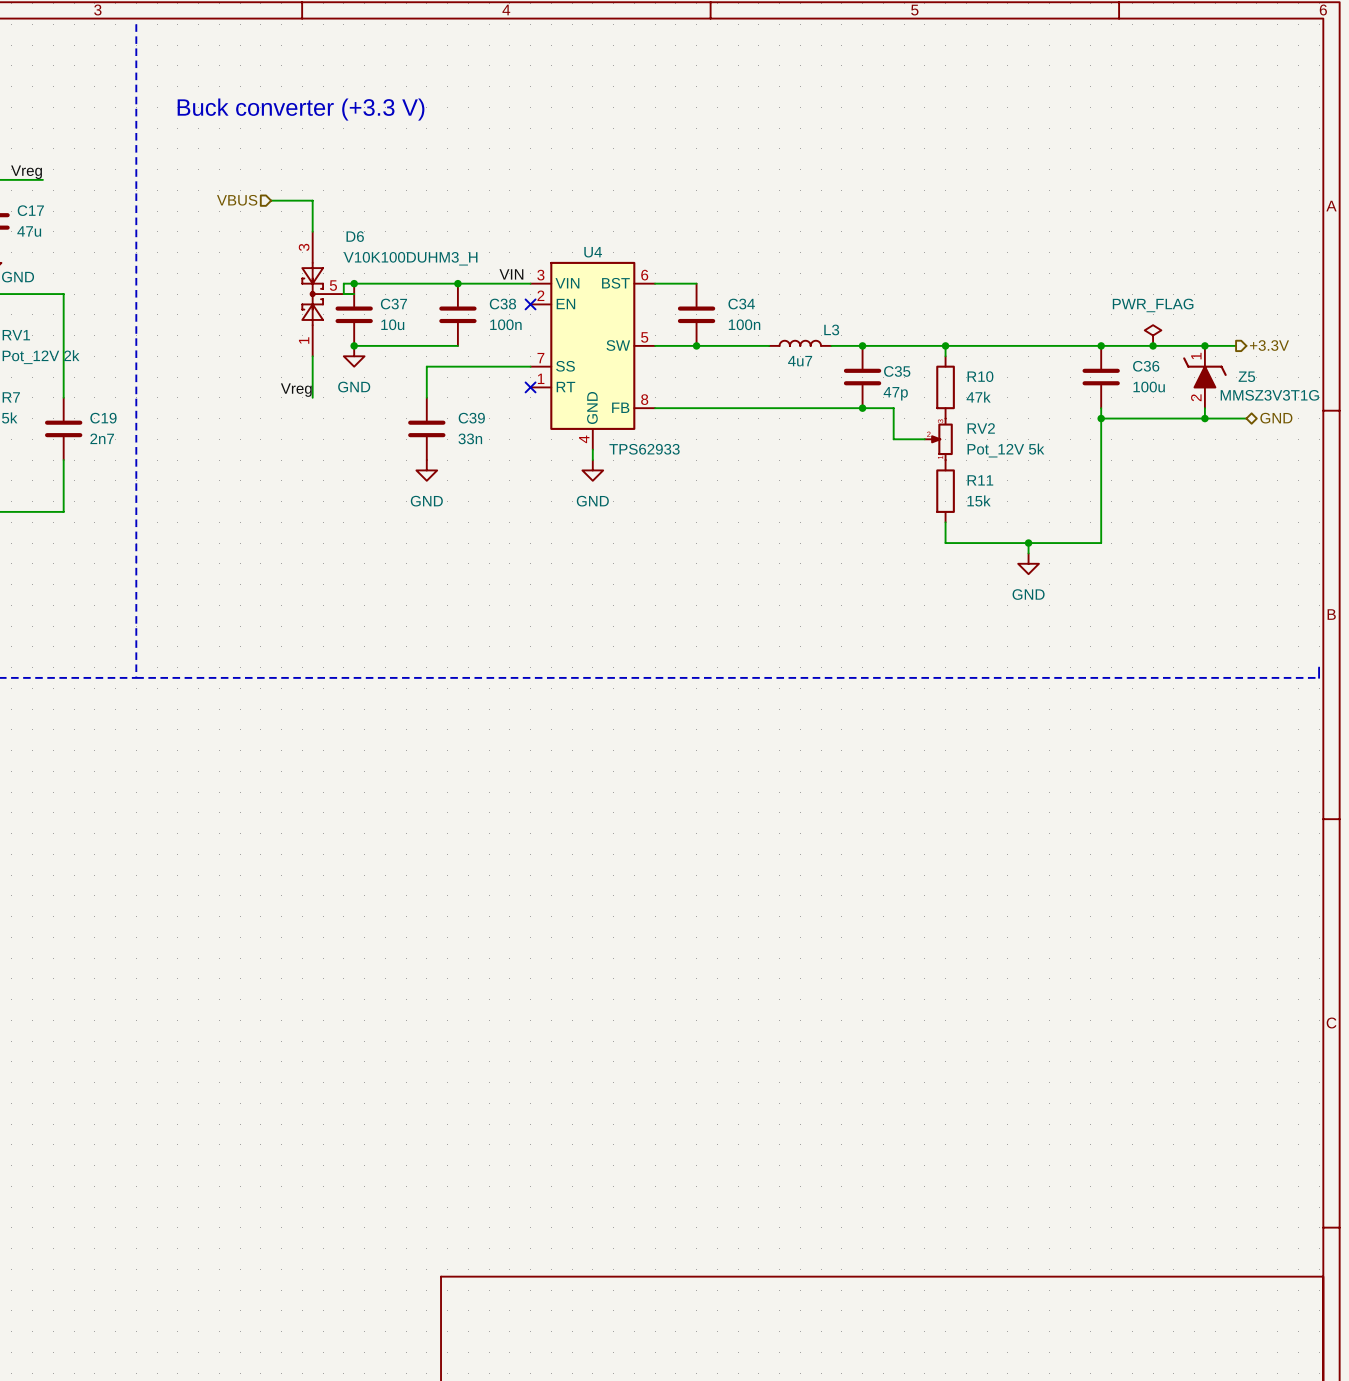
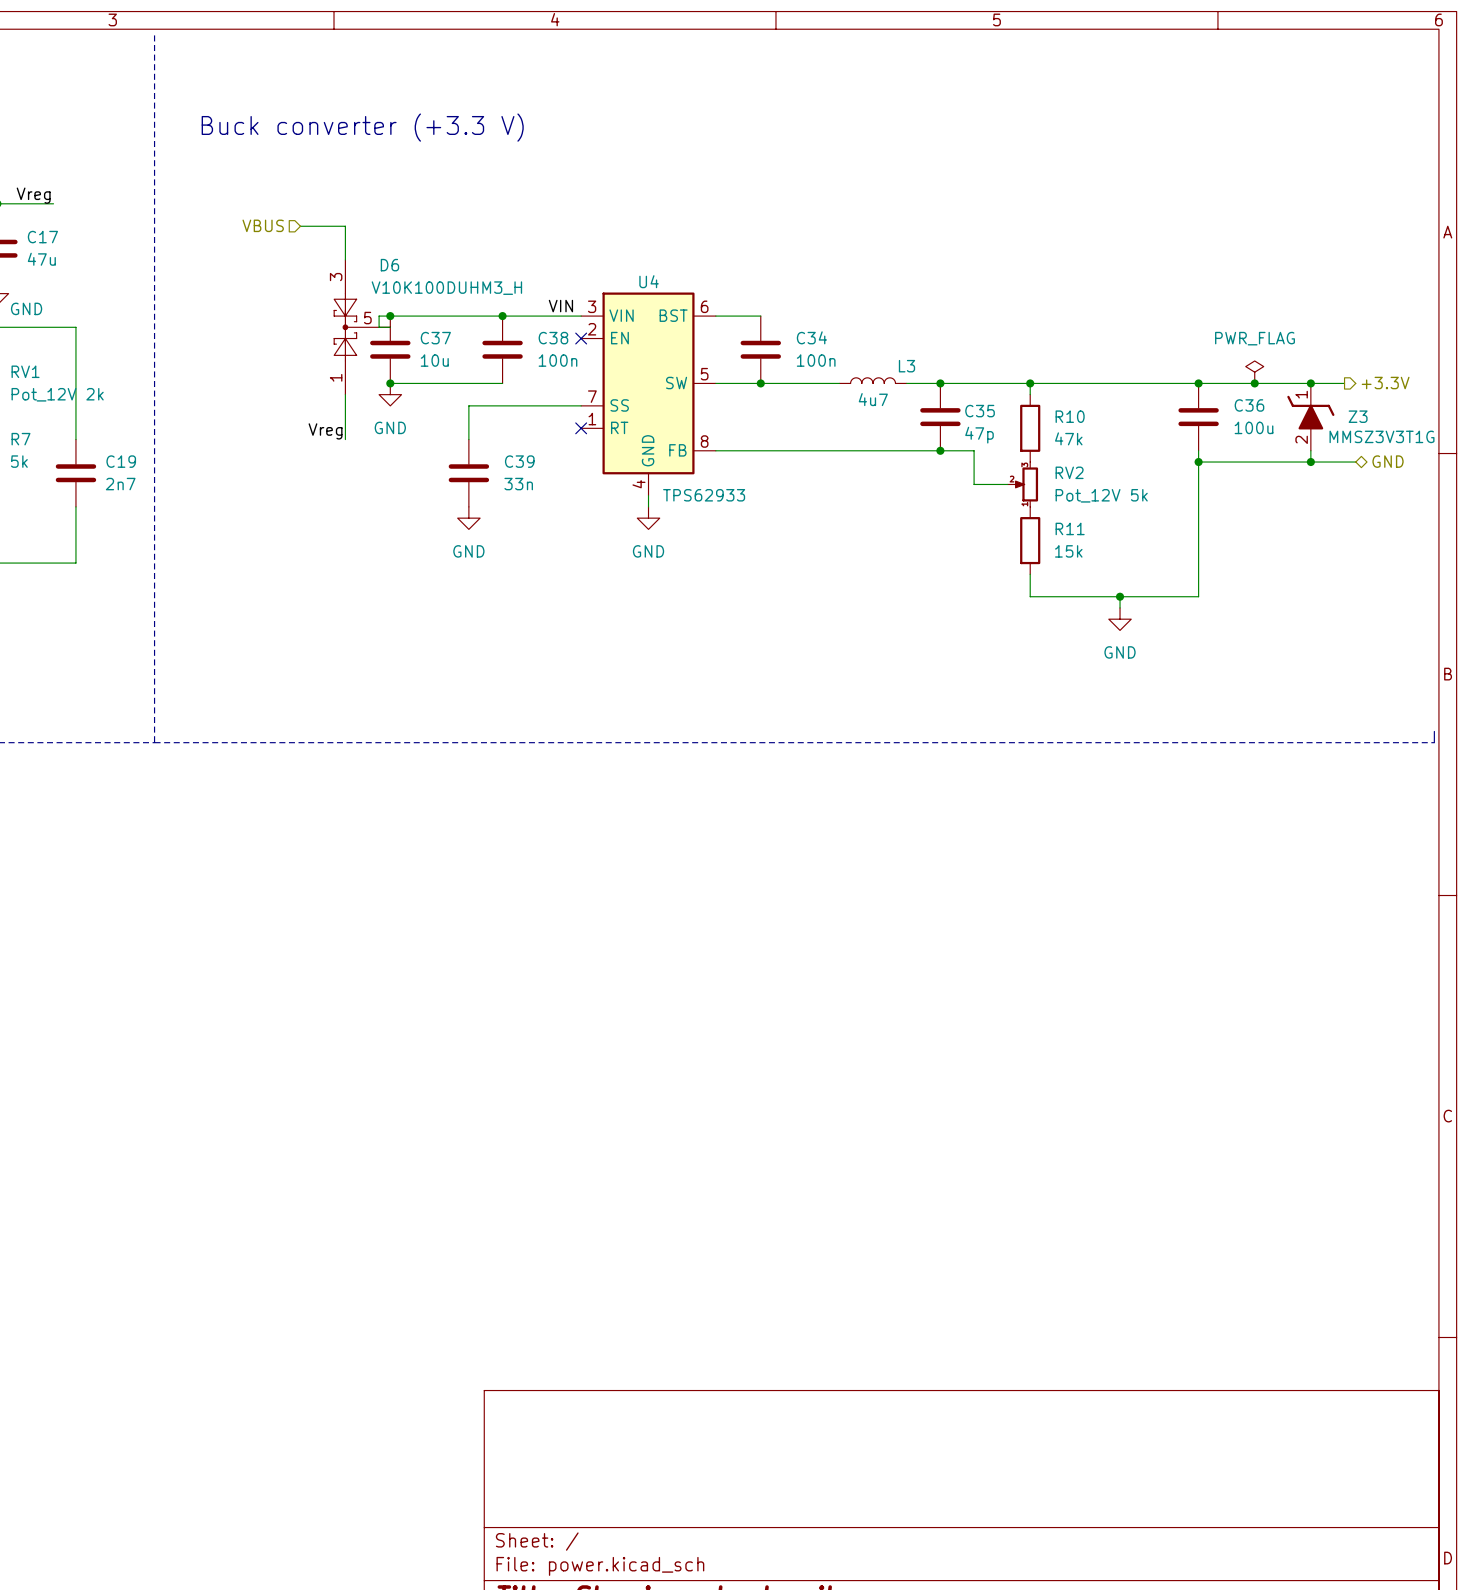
Z5 name: Z5 (1246, 376) -> Z3 (1358, 416)

